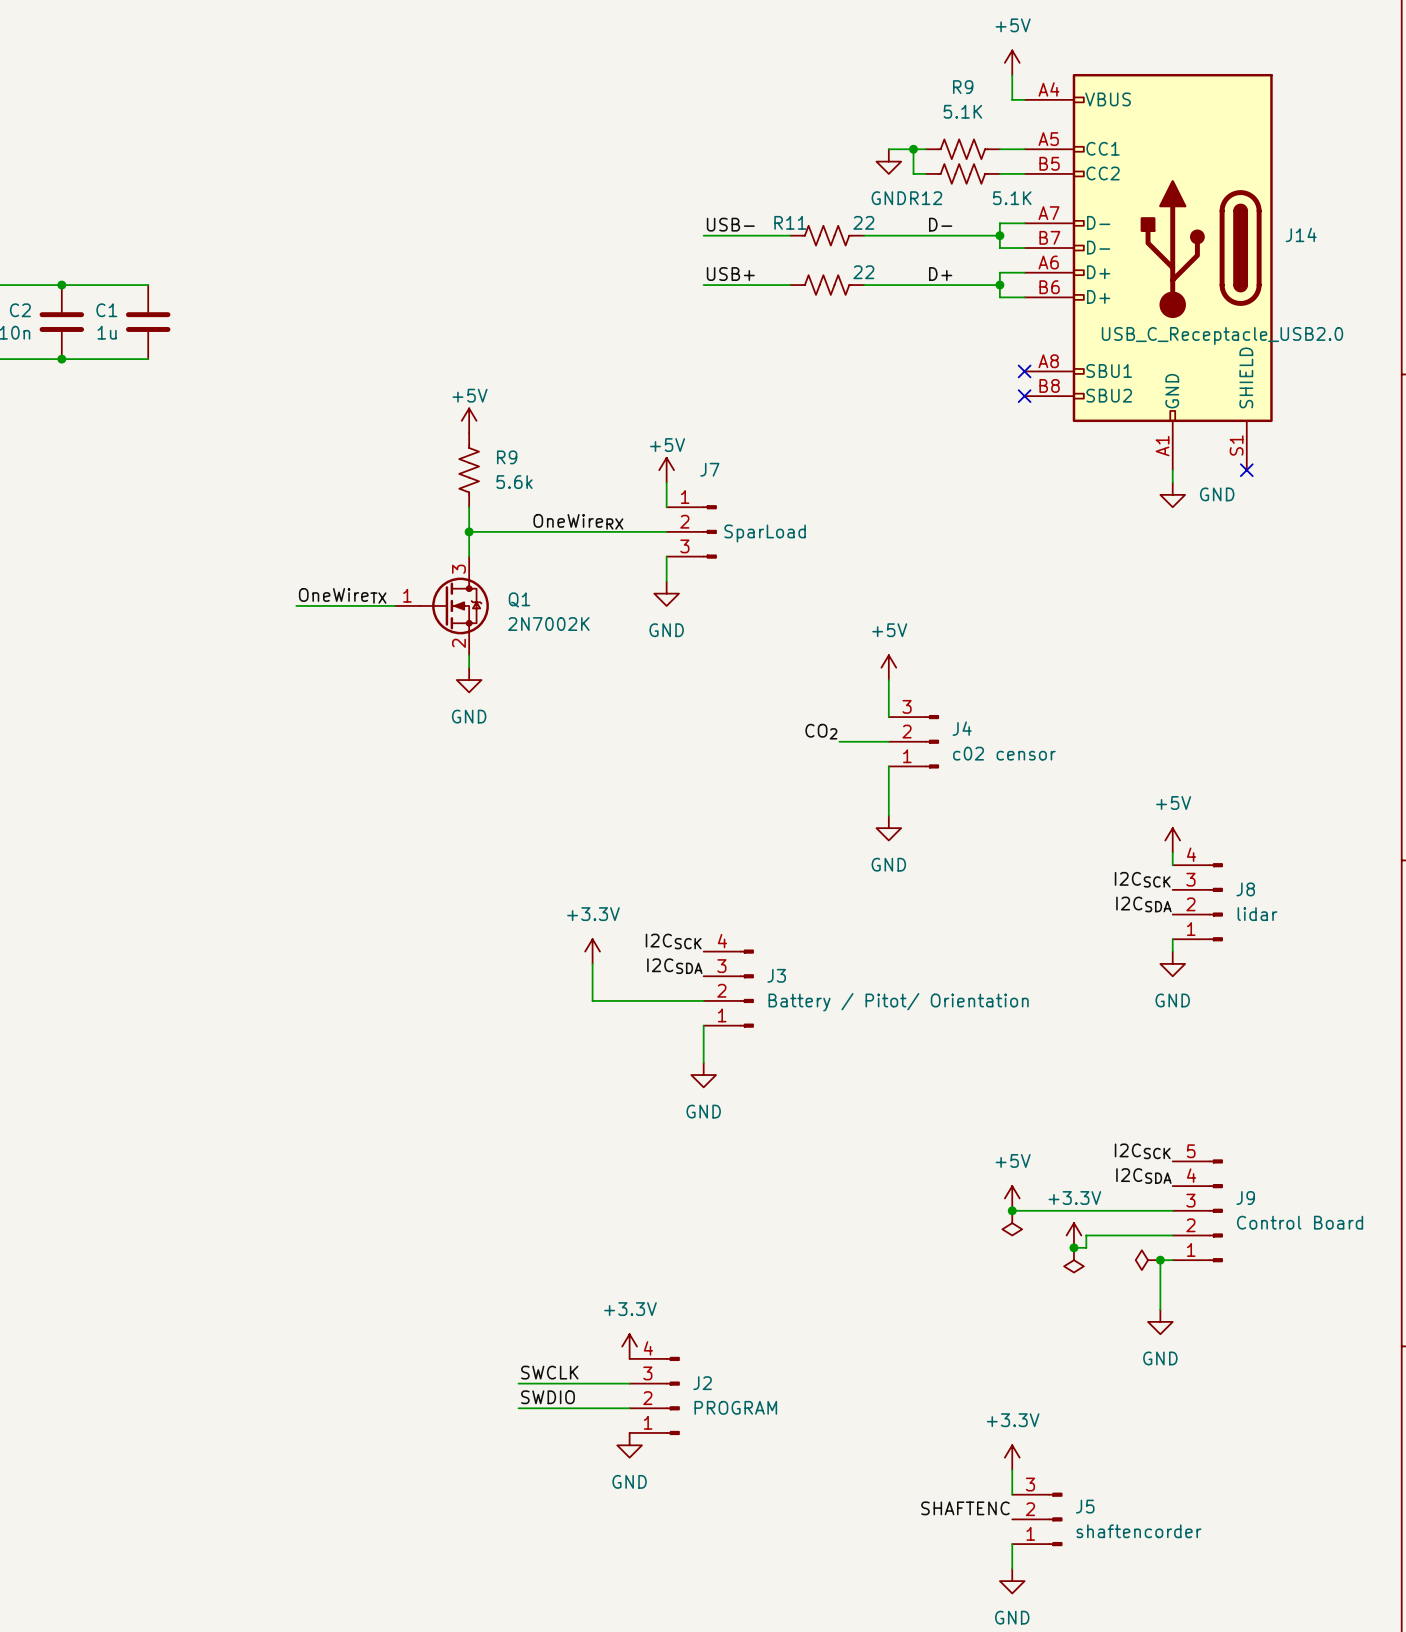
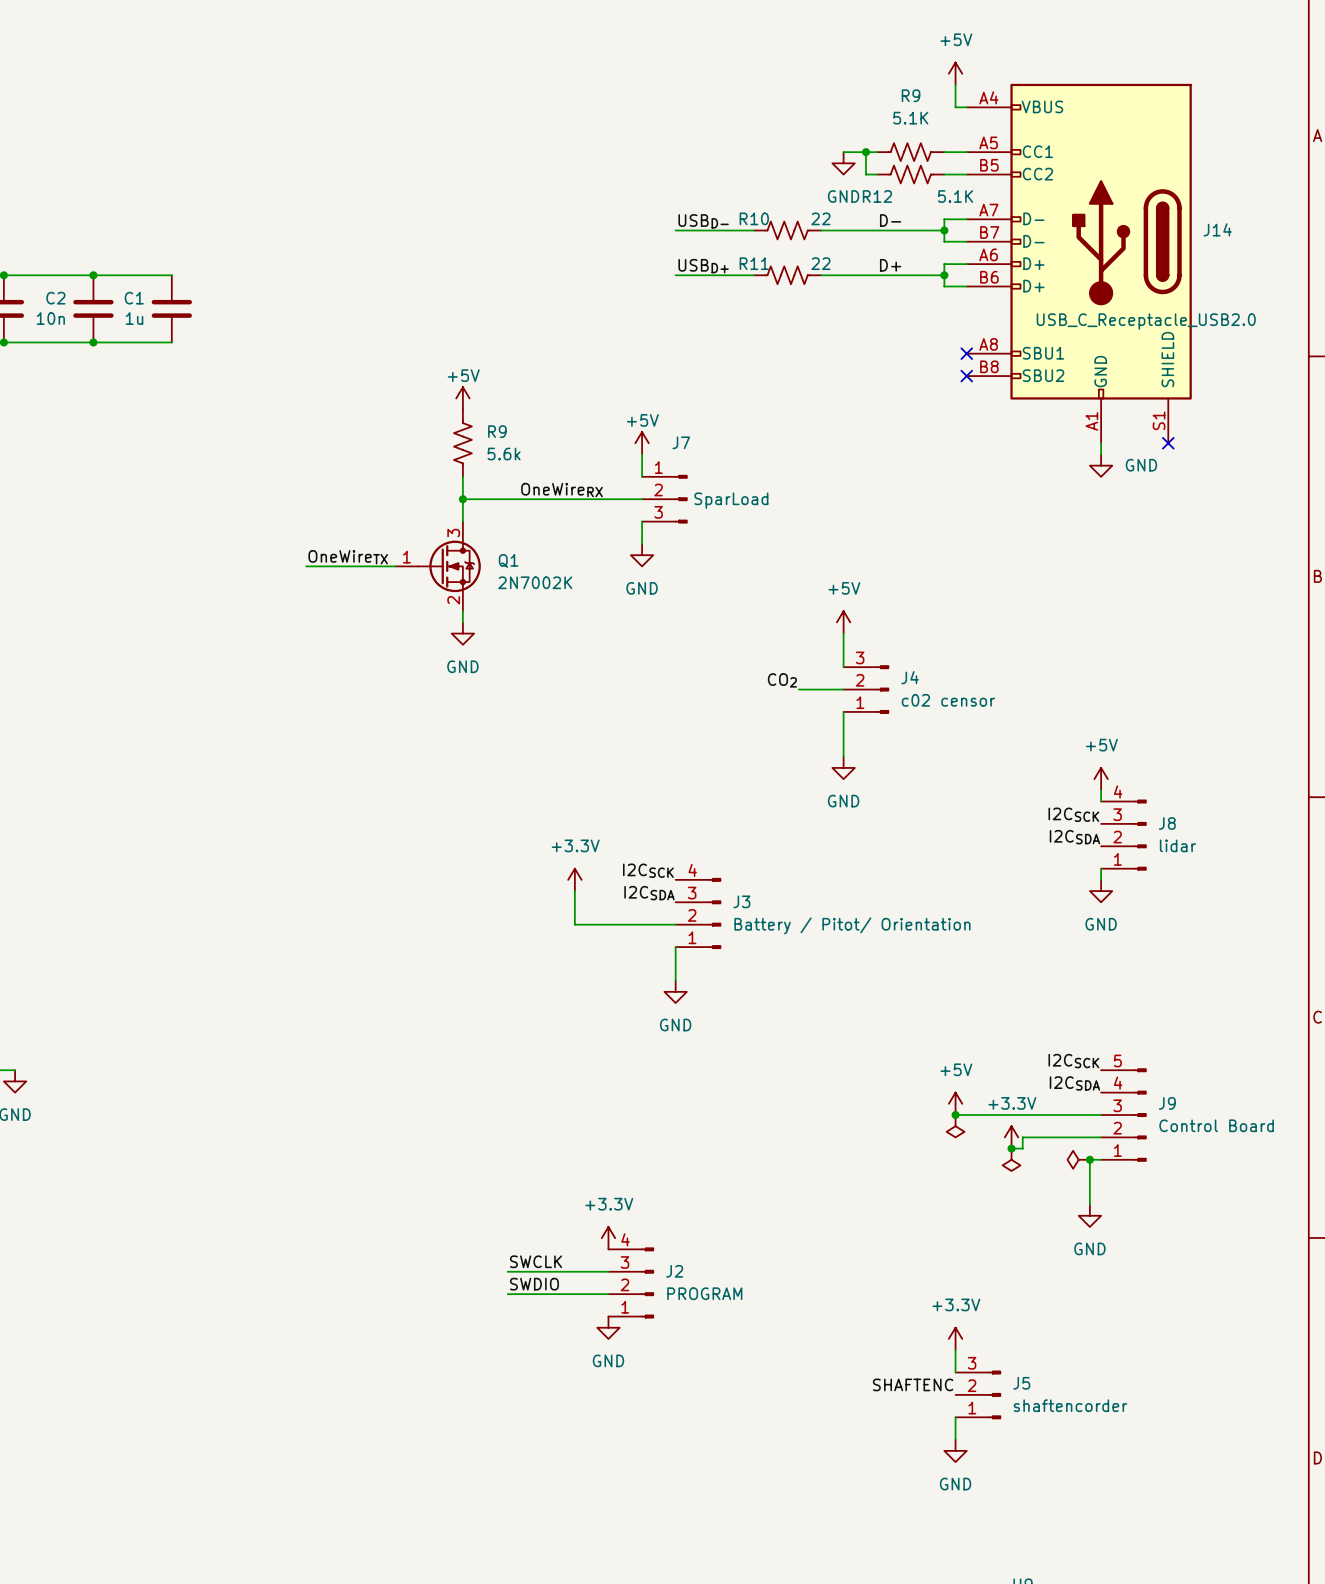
R11 name: R11 (790, 222) -> R10 (754, 218)
label: USB- (730, 224) -> USBD- (703, 221)
R11 name: none -> R11 (754, 263)
label: USB+ (730, 274) -> USBD+ (703, 266)

